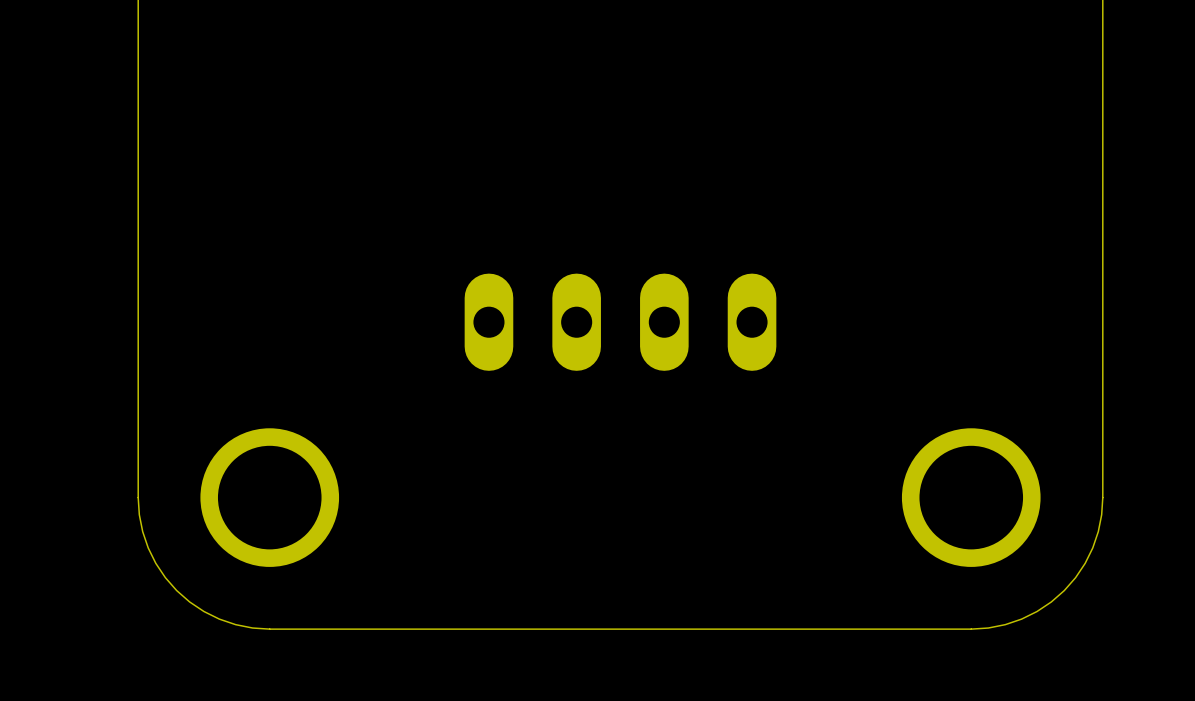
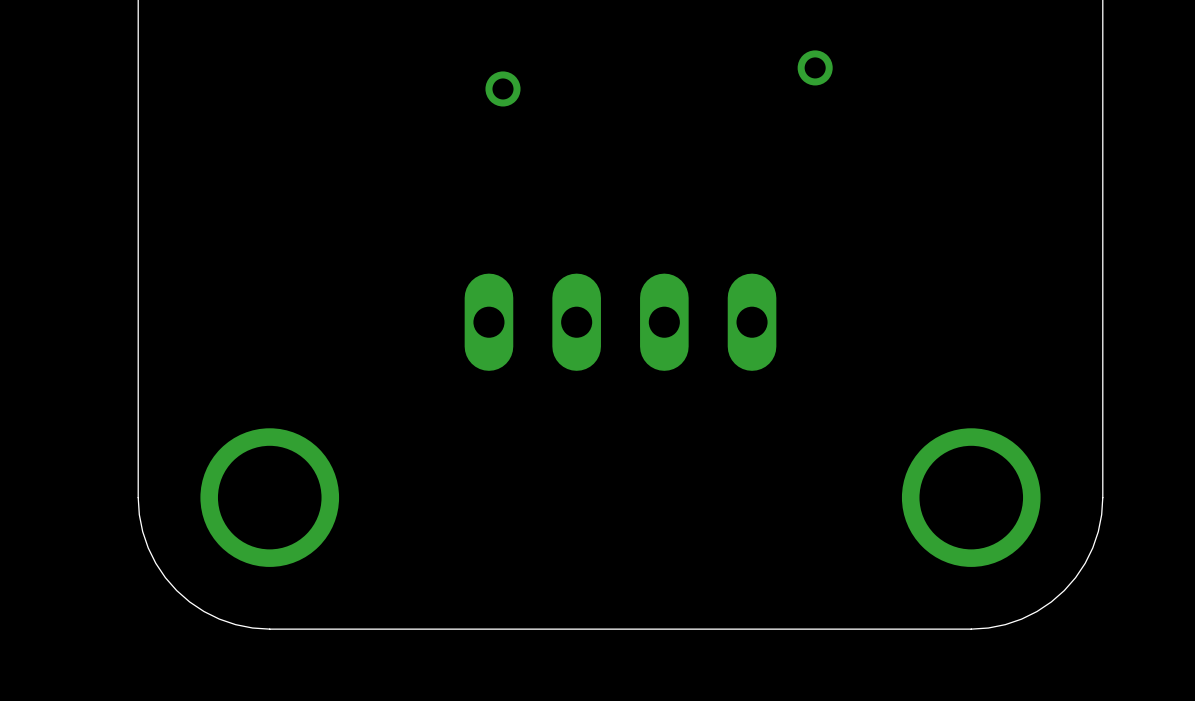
via: none -> (815, 67)
via: none -> (502, 88)

